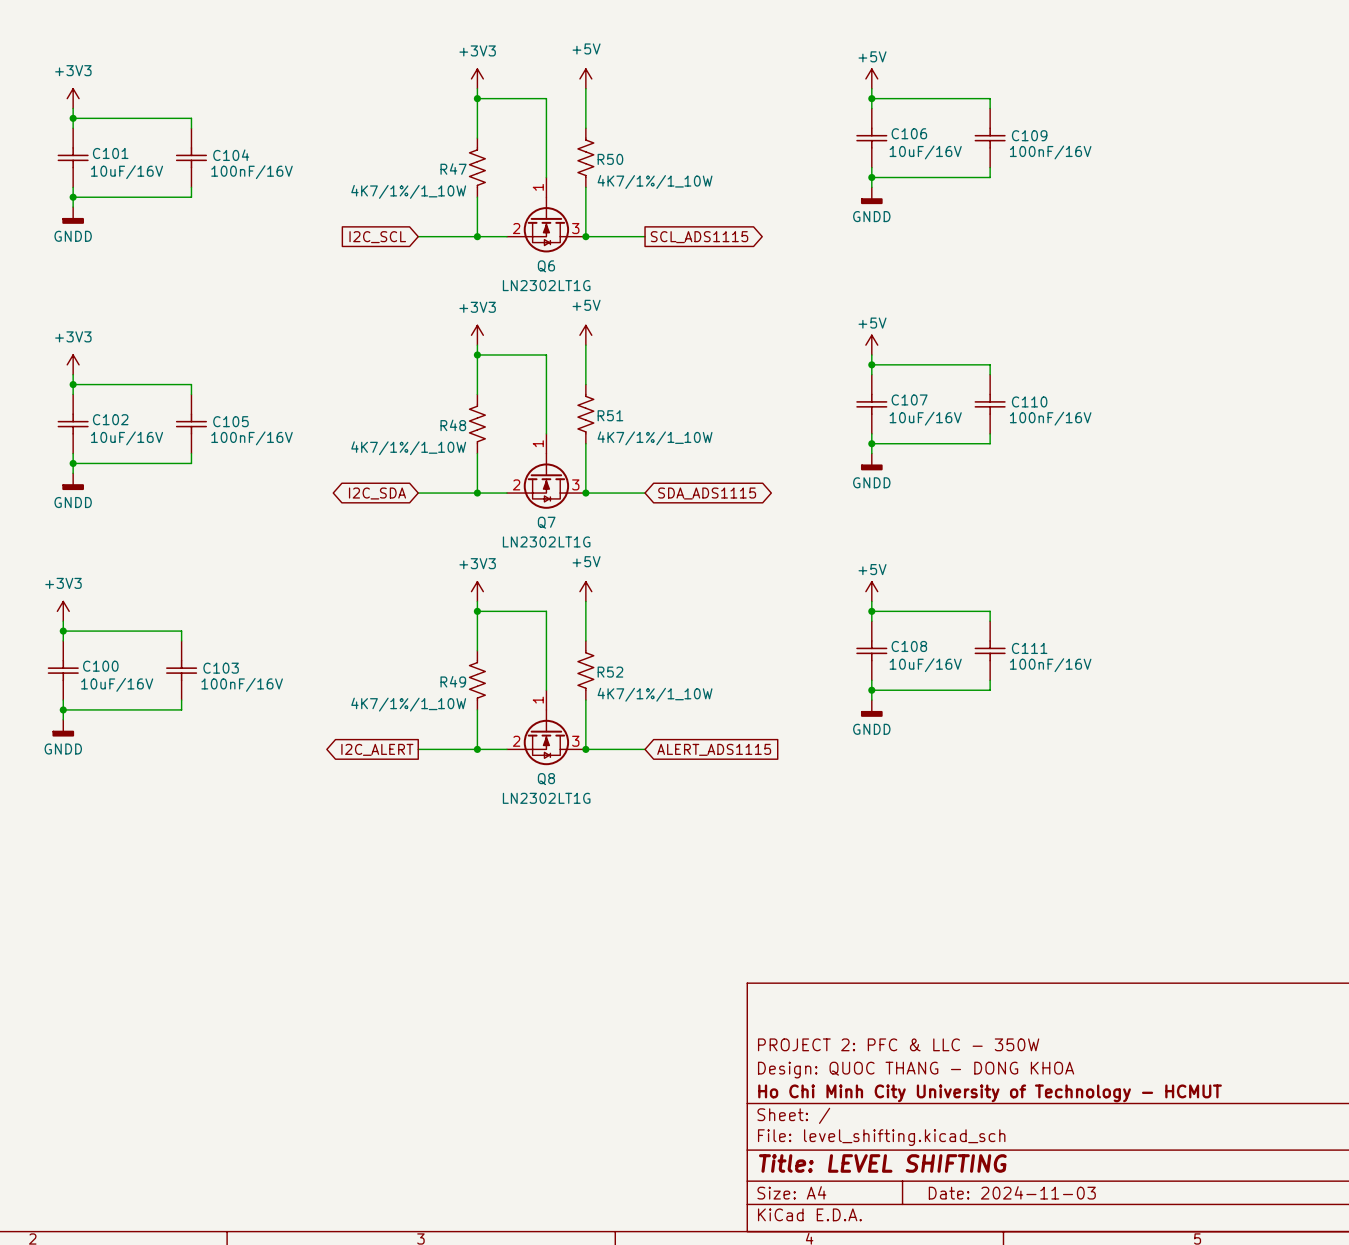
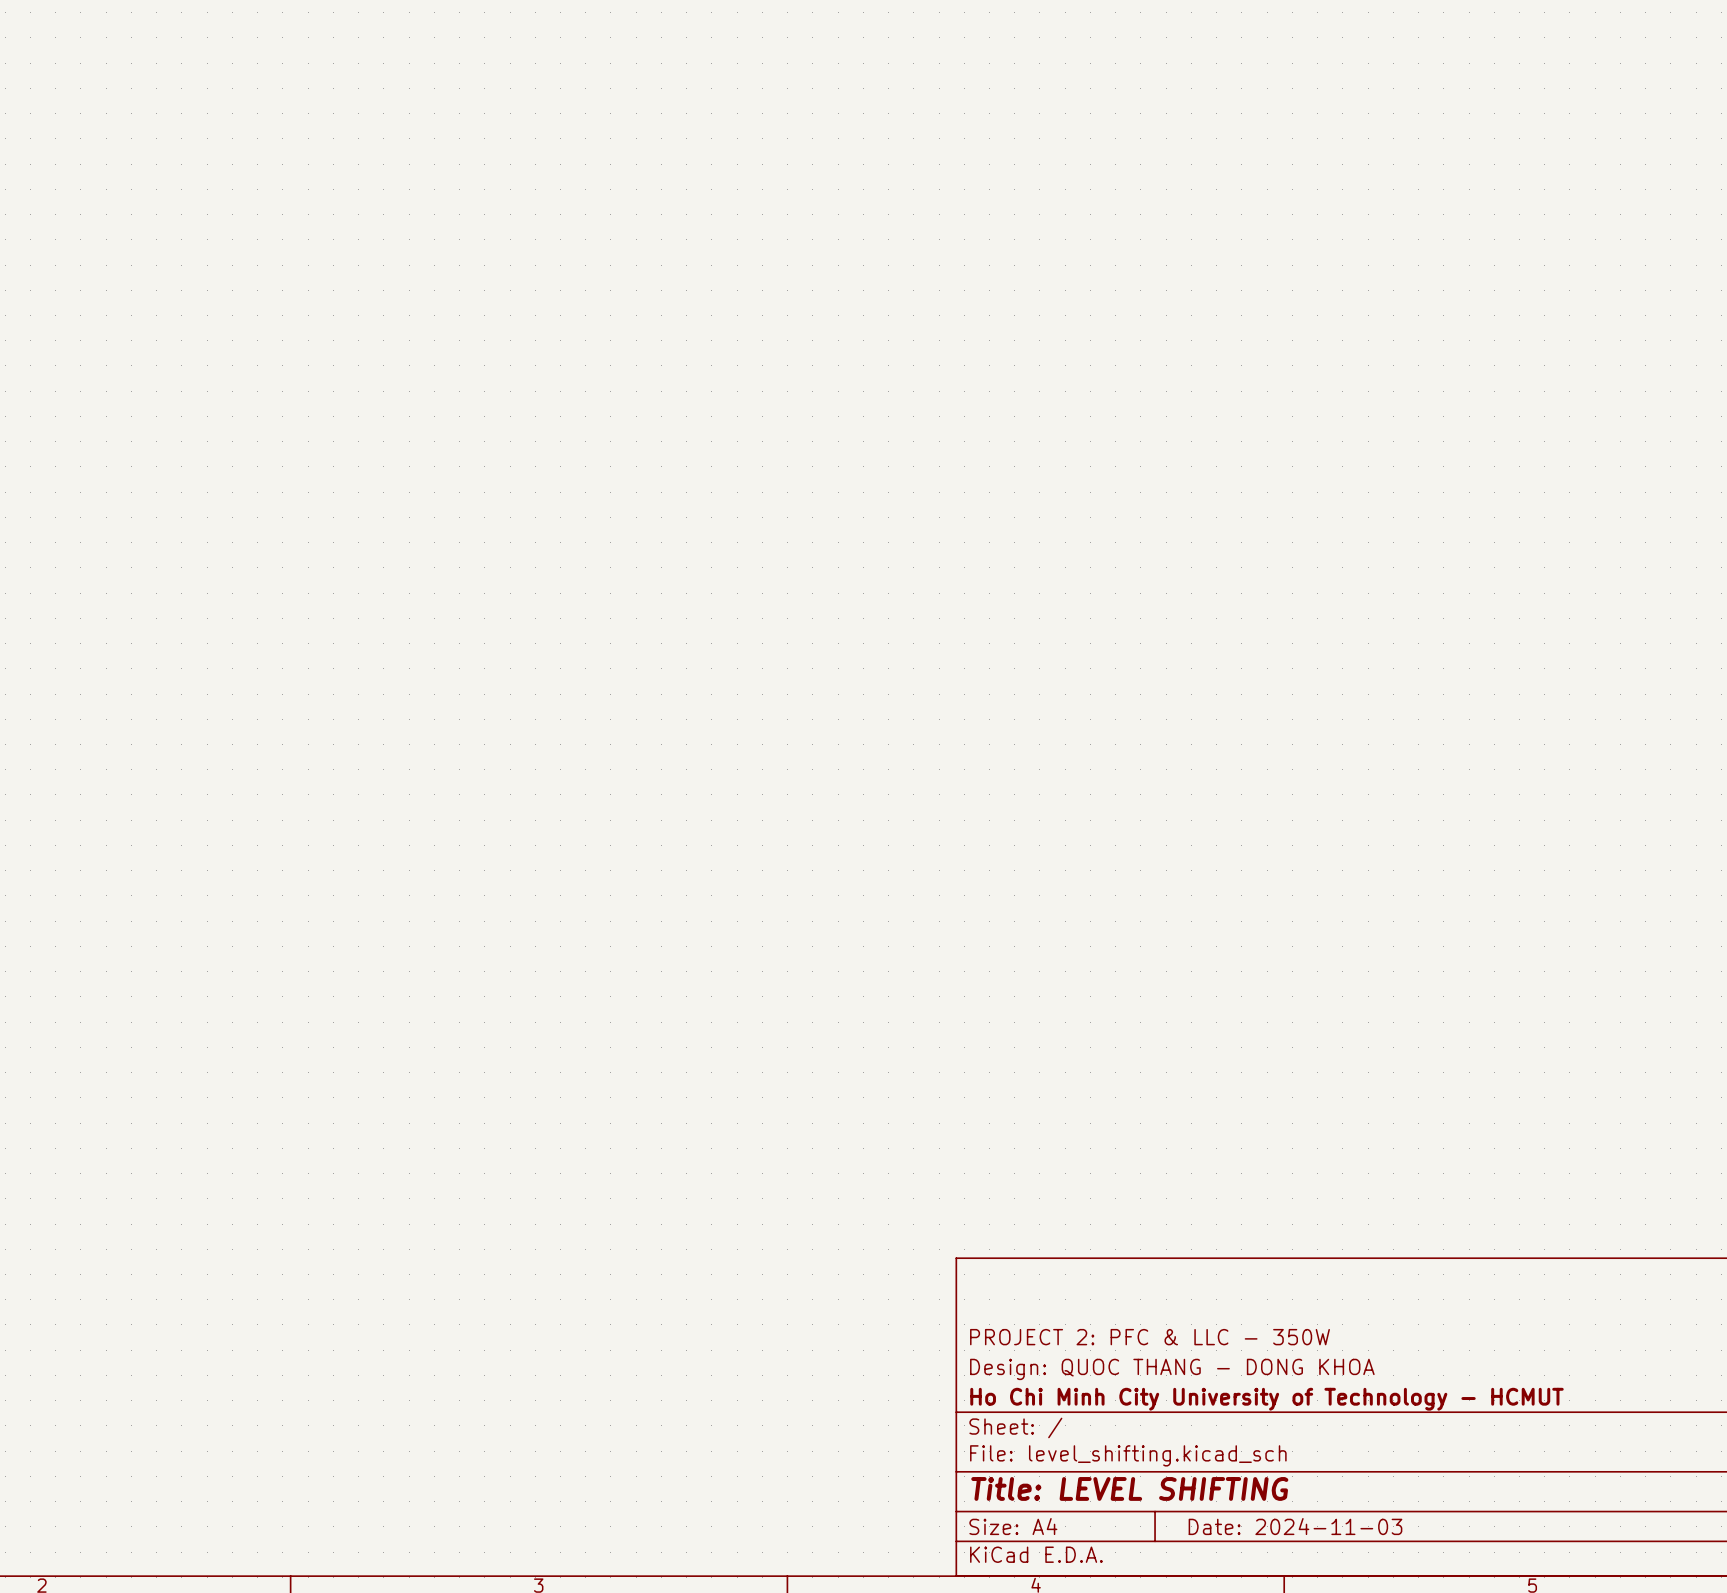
power symbol: +3V3 (477, 78) -> none
power symbol: +5V (585, 78) -> none
power symbol: +5V (871, 78) -> none
wire: (477, 88) (477, 138) -> none
wire: (585, 88) (585, 128) -> none
wire: (871, 88) (871, 108) -> none
power symbol: +3V3 (73, 98) -> none
wire: (477, 98) (546, 98) (546, 177) -> none
junction: (477, 98) -> none
wire: (871, 98) (990, 98) (990, 108) -> none
junction: (871, 98) -> none
wire: (73, 108) (73, 128) -> none
wire: (73, 118) (191, 118) (191, 128) -> none
junction: (73, 118) -> none
C106: 10uF/16V (871, 138) -> none
C109: 100nF/16V (990, 138) -> none
C101: 10uF/16V (73, 157) -> none
C104: 100nF/16V (191, 157) -> none
R50: 4K7/1%/1_10W (585, 157) -> none
R47: 4K7/1%/1_10W (477, 167) -> none
wire: (871, 167) (871, 187) -> none
wire: (990, 167) (990, 177) (871, 177) -> none
junction: (871, 177) -> none
wire: (73, 187) (73, 207) -> none
wire: (191, 187) (191, 197) (73, 197) -> none
wire: (585, 187) (585, 236) (645, 236) -> none
power symbol: GNDD (871, 195) -> none
junction: (73, 197) -> none
wire: (477, 197) (477, 236) -> none
Q6: LN2302LT1G (546, 214) -> none
power symbol: GNDD (73, 215) -> none
wire: (418, 236) (506, 236) -> none
junction: (477, 236) -> none
junction: (585, 236) -> none
global label: I2C_SCL (377, 237) -> none
global label: SCL_ADS1115 (699, 237) -> none
power symbol: +3V3 (477, 335) -> none
power symbol: +5V (585, 335) -> none
wire: (477, 345) (477, 394) -> none
wire: (585, 345) (585, 384) -> none
power symbol: +5V (871, 345) -> none
wire: (477, 354) (546, 354) (546, 433) -> none
junction: (477, 354) -> none
wire: (871, 354) (871, 374) -> none
power symbol: +3V3 (73, 364) -> none
wire: (871, 364) (990, 364) (990, 374) -> none
junction: (871, 364) -> none
wire: (73, 374) (73, 394) -> none
wire: (73, 384) (191, 384) (191, 394) -> none
junction: (73, 384) -> none
C107: 10uF/16V (871, 404) -> none
C110: 100nF/16V (990, 404) -> none
R51: 4K7/1%/1_10W (585, 414) -> none
C102: 10uF/16V (73, 424) -> none
C105: 100nF/16V (191, 424) -> none
R48: 4K7/1%/1_10W (477, 424) -> none
wire: (871, 433) (871, 453) -> none
wire: (990, 433) (990, 443) (871, 443) -> none
wire: (585, 443) (585, 493) (645, 493) -> none
junction: (871, 443) -> none
wire: (73, 453) (73, 473) -> none
wire: (191, 453) (191, 463) (73, 463) -> none
wire: (477, 453) (477, 493) -> none
power symbol: GNDD (871, 461) -> none
junction: (73, 463) -> none
Q7: LN2302LT1G (546, 471) -> none
power symbol: GNDD (73, 481) -> none
global label: I2C_SDA (377, 493) -> none
wire: (418, 493) (506, 493) -> none
junction: (477, 493) -> none
junction: (585, 493) -> none
global label: SDA_ADS1115 (707, 493) -> none
power symbol: +3V3 (477, 591) -> none
power symbol: +5V (585, 591) -> none
power symbol: +5V (871, 591) -> none
wire: (477, 601) (477, 650) -> none
wire: (585, 601) (585, 640) -> none
wire: (871, 601) (871, 621) -> none
power symbol: +3V3 (63, 611) -> none
wire: (477, 611) (546, 611) (546, 690) -> none
junction: (477, 611) -> none
wire: (871, 611) (990, 611) (990, 621) -> none
junction: (871, 611) -> none
wire: (63, 621) (63, 640) -> none
wire: (63, 631) (181, 631) (181, 640) -> none
junction: (63, 631) -> none
C108: 10uF/16V (871, 650) -> none
C111: 100nF/16V (990, 650) -> none
C100: 10uF/16V (63, 670) -> none
C103: 100nF/16V (181, 670) -> none
R52: 4K7/1%/1_10W (585, 670) -> none
R49: 4K7/1%/1_10W (477, 680) -> none
wire: (871, 680) (871, 700) -> none
wire: (990, 680) (990, 690) (871, 690) -> none
junction: (871, 690) -> none
wire: (63, 700) (63, 719) -> none
wire: (181, 700) (181, 709) (63, 709) -> none
wire: (585, 700) (585, 749) (645, 749) -> none
power symbol: GNDD (871, 708) -> none
junction: (63, 709) -> none
wire: (477, 709) (477, 749) -> none
Q8: LN2302LT1G (546, 727) -> none
power symbol: GNDD (63, 728) -> none
global label: I2C_ALERT (377, 749) -> none
wire: (418, 749) (506, 749) -> none
junction: (477, 749) -> none
junction: (585, 749) -> none
global label: ALERT_ADS1115 (714, 749) -> none

